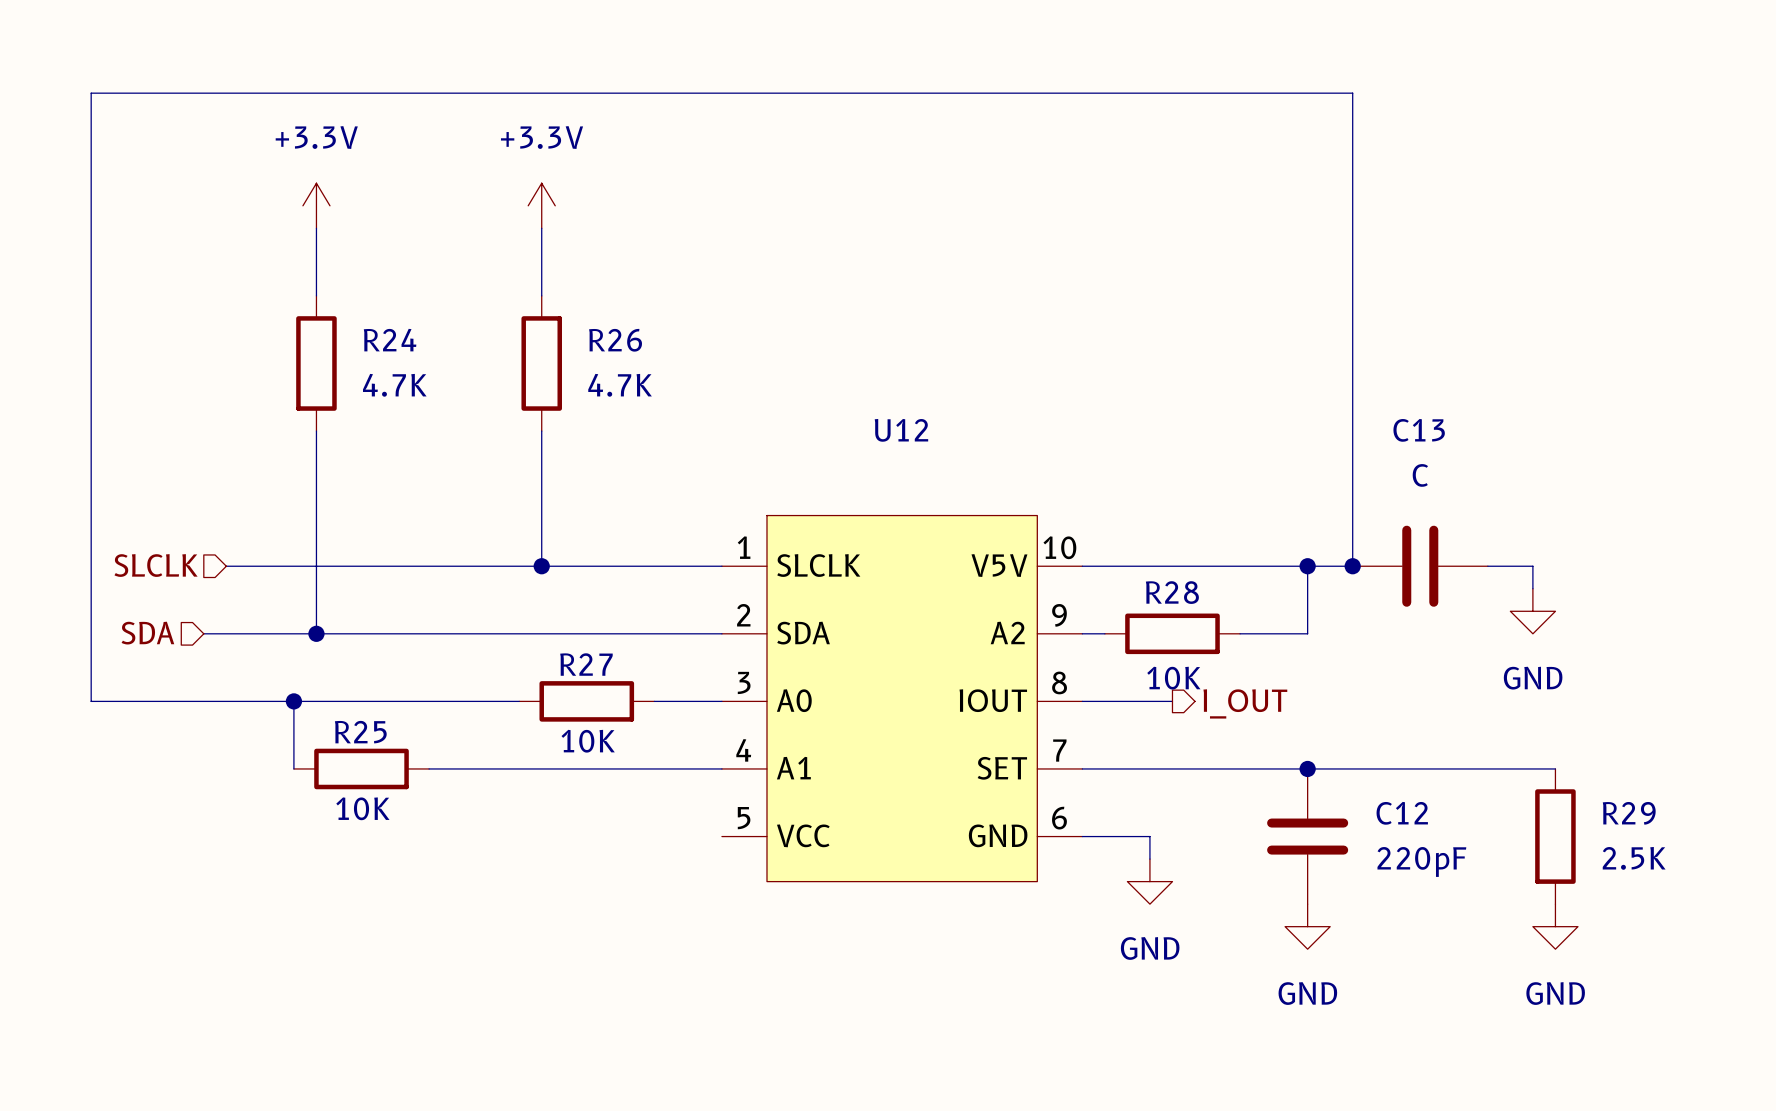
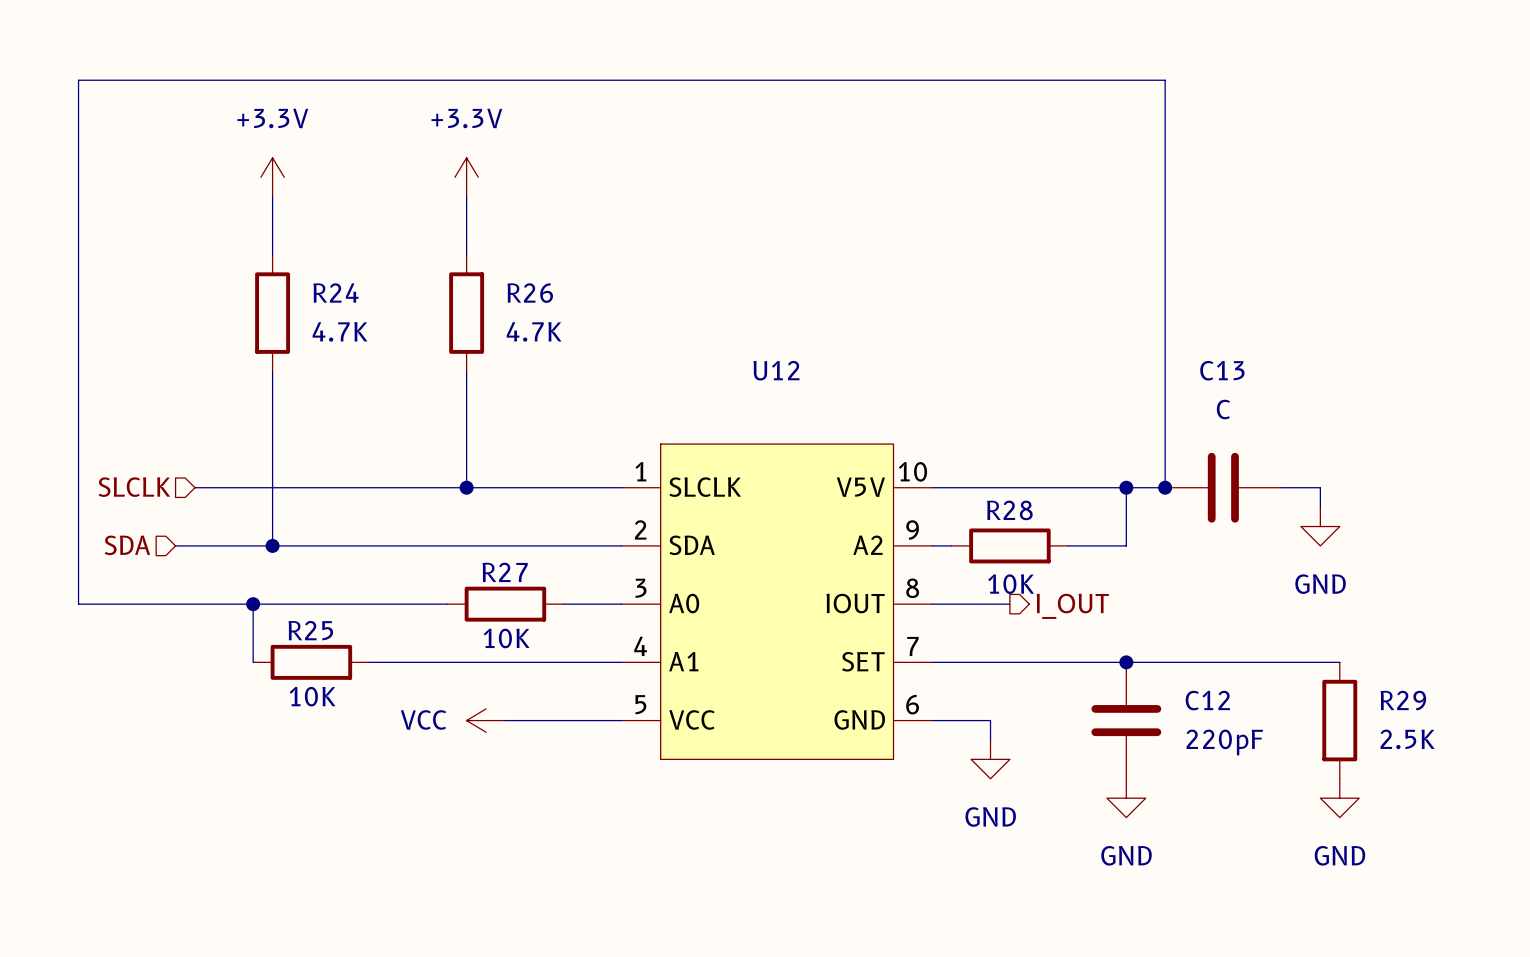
power symbol: none -> VCC (486, 720)
wire: none -> (505, 720) (621, 720)

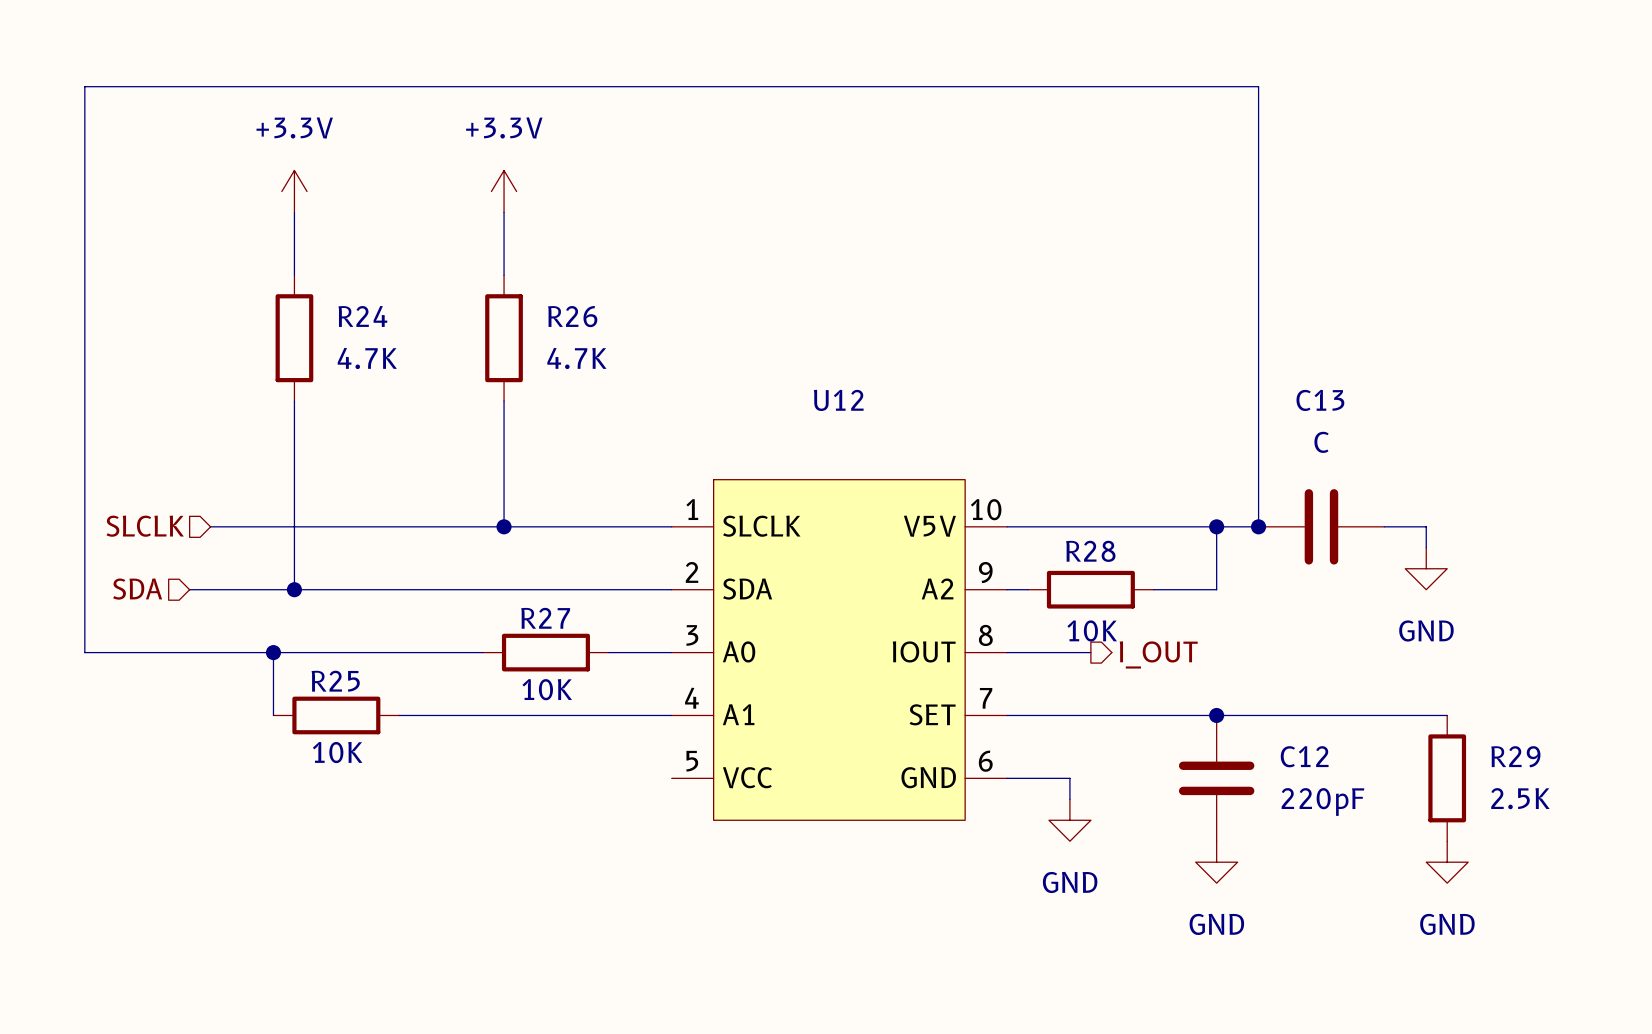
power symbol: VCC (486, 720) -> none
wire: (505, 720) (621, 720) -> none

